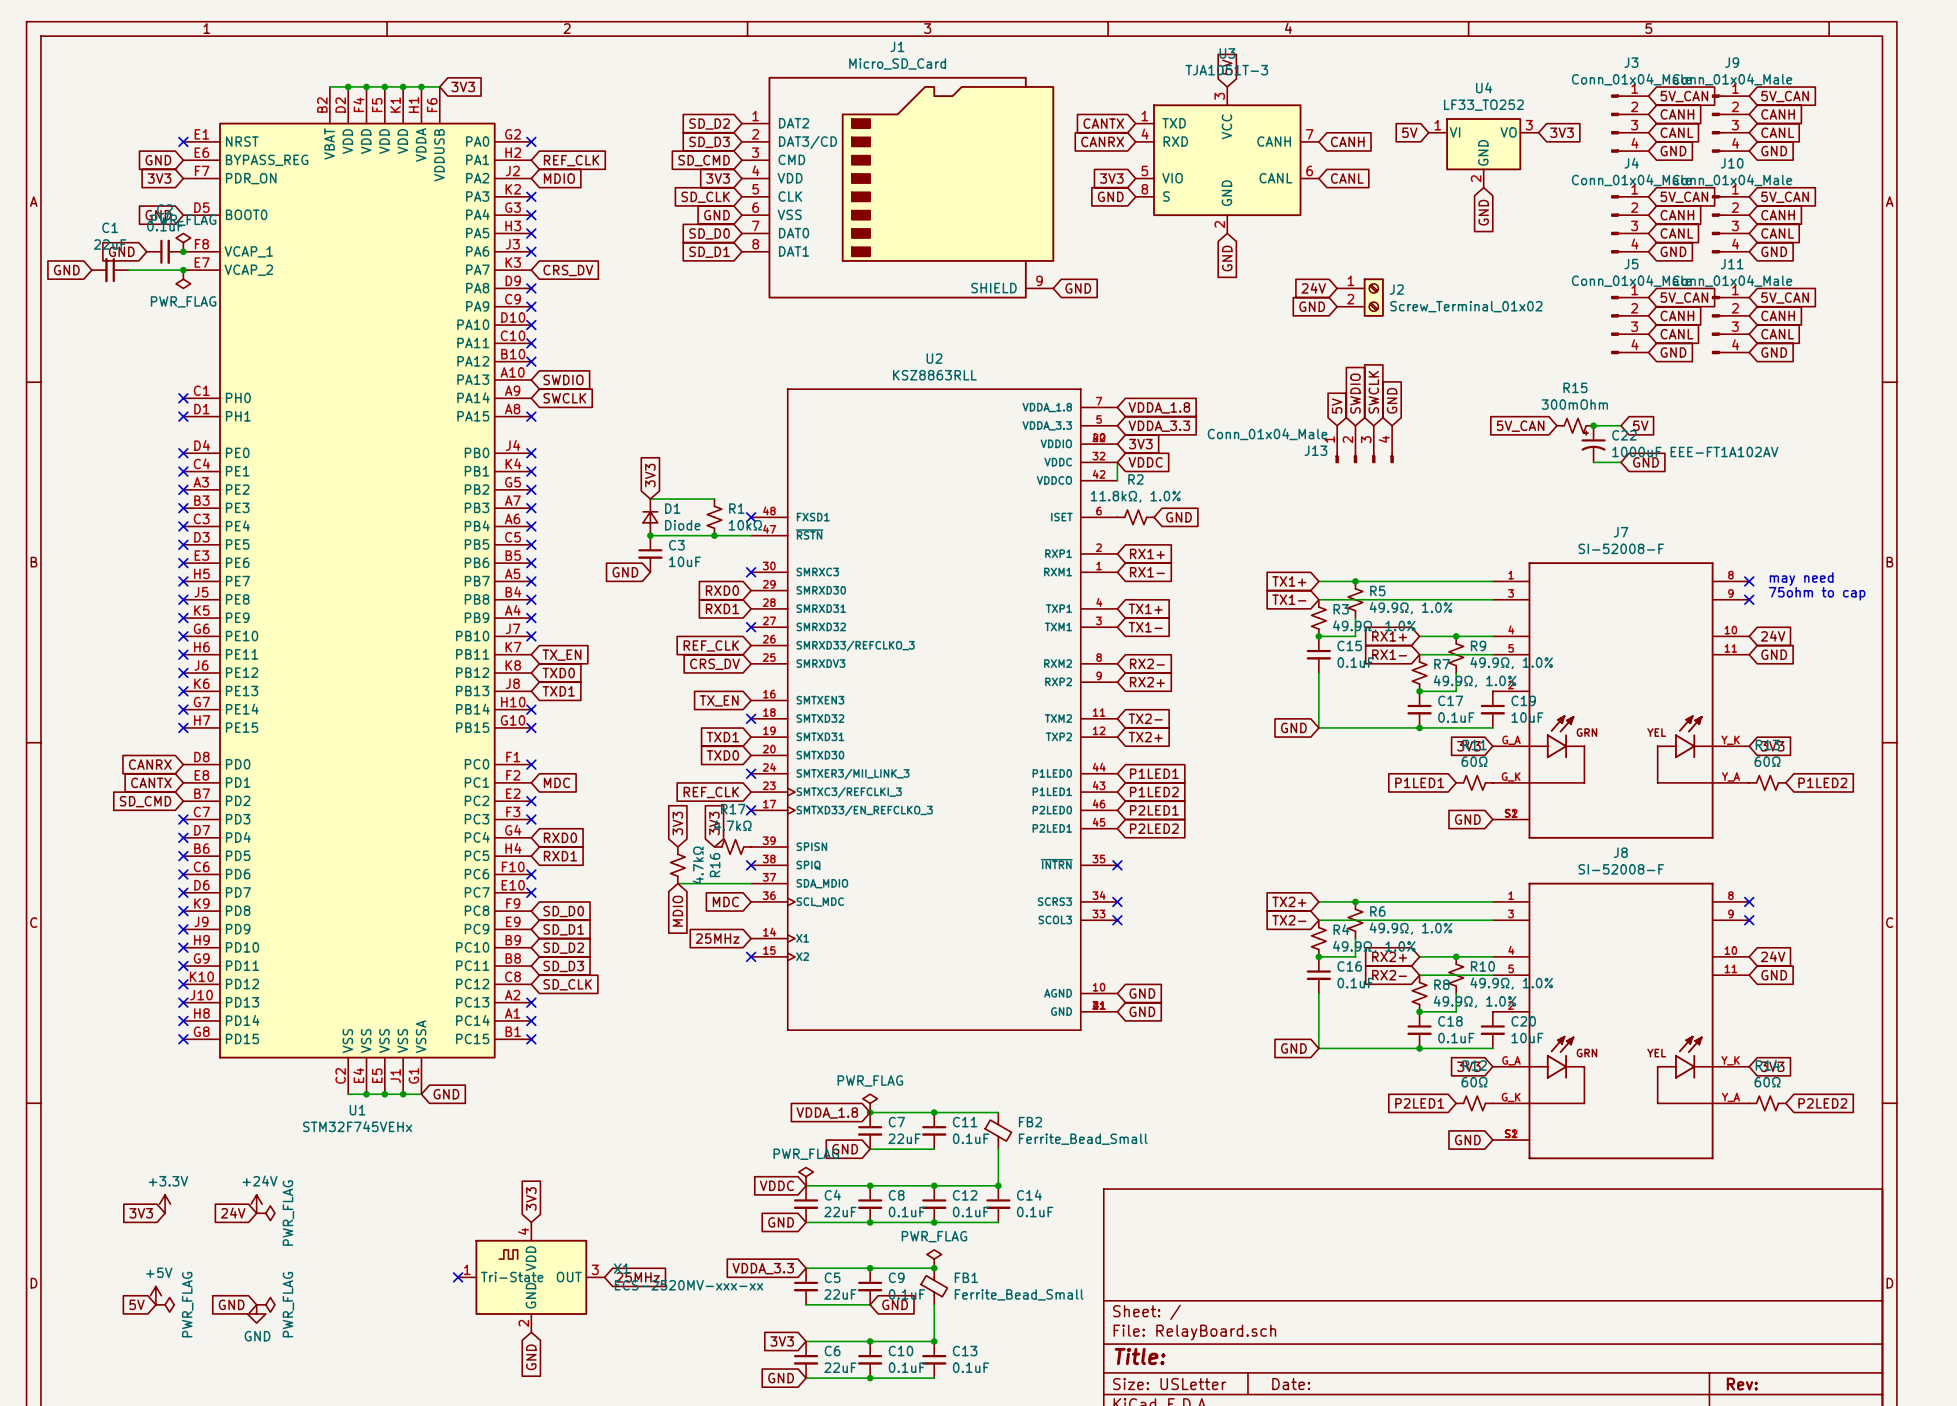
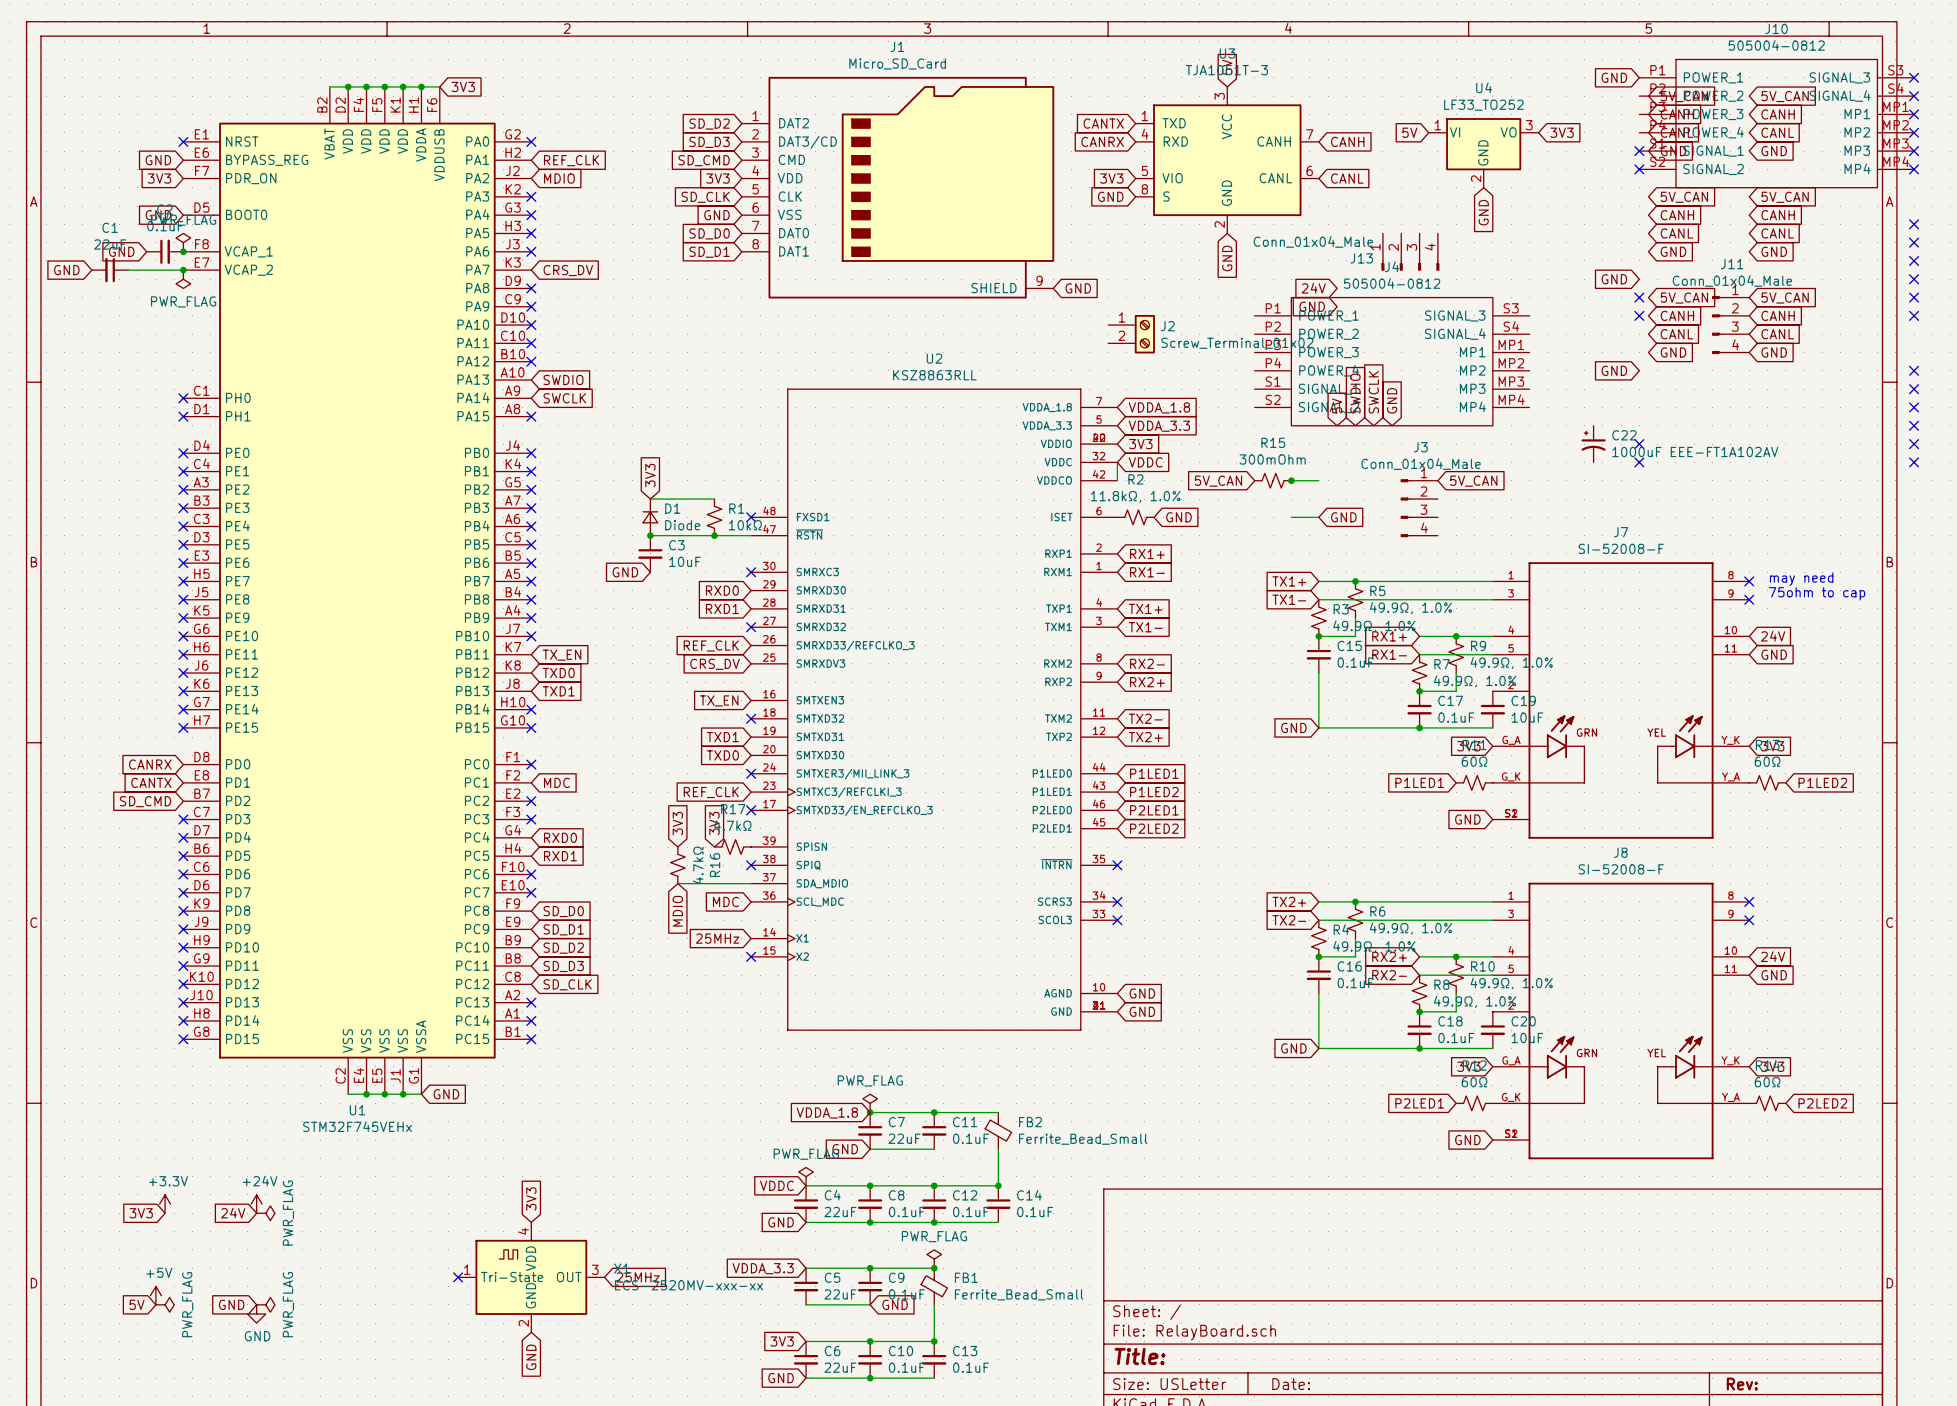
global label: none -> GND (1614, 77)
no-connect mark: none -> (1914, 77)
no-connect mark: none -> (1914, 96)
no-connect mark: none -> (1914, 114)
J3 position: (1629, 123) -> (1419, 508)
J9: Conn_01x04_Male (1730, 123) -> none
no-connect mark: none -> (1914, 132)
no-connect mark: none -> (1639, 151)
no-connect mark: none -> (1914, 151)
J4 name position: J4 (1631, 163) -> J4 (1392, 266)
J10 name position: J10 (1732, 163) -> J10 (1776, 28)
no-connect mark: none -> (1639, 169)
no-connect mark: none -> (1914, 169)
J4 value: Conn_01x04_Male (1631, 180) -> 505004-0812 (1392, 283)
J10 value: Conn_01x04_Male (1732, 180) -> 505004-0812 (1776, 45)
J4 symbol: [1611, 195, 1649, 254] -> [1254, 297, 1530, 427]
J10 symbol: [1712, 195, 1750, 254] -> [1639, 58, 1915, 189]
no-connect mark: none -> (1914, 224)
no-connect mark: none -> (1914, 242)
no-connect mark: none -> (1914, 260)
global label: none -> GND (1614, 279)
no-connect mark: none -> (1914, 279)
J2 position: (1360, 297) -> (1131, 334)
no-connect mark: none -> (1639, 297)
no-connect mark: none -> (1914, 297)
no-connect mark: none -> (1639, 315)
no-connect mark: none -> (1914, 315)
J5: Conn_01x04_Male (1629, 325) -> none
global label: none -> GND (1614, 370)
no-connect mark: none -> (1914, 370)
no-connect mark: none -> (1914, 389)
no-connect mark: none -> (1914, 407)
R15 position: (1575, 425) -> (1273, 480)
wire: (1593, 425) (1621, 425) -> none
junction: (1593, 425) -> none
global label: 5V (1640, 425) -> none
no-connect mark: none -> (1914, 425)
global label rotation: 0° (1520, 426) -> 180° (1473, 481)
J13 position: (1364, 444) -> (1410, 252)
no-connect mark: none -> (1639, 444)
no-connect mark: none -> (1914, 444)
wire: (1593, 462) (1621, 462) -> none
no-connect mark: none -> (1639, 462)
global label: GND (1646, 462) -> none
no-connect mark: none -> (1914, 462)
wire: none -> (1291, 480) (1318, 480)
junction: none -> (1291, 480)
global label: none -> 5V_CAN (1218, 481)
wire: none -> (1291, 517) (1318, 517)
global label: none -> GND (1343, 517)

